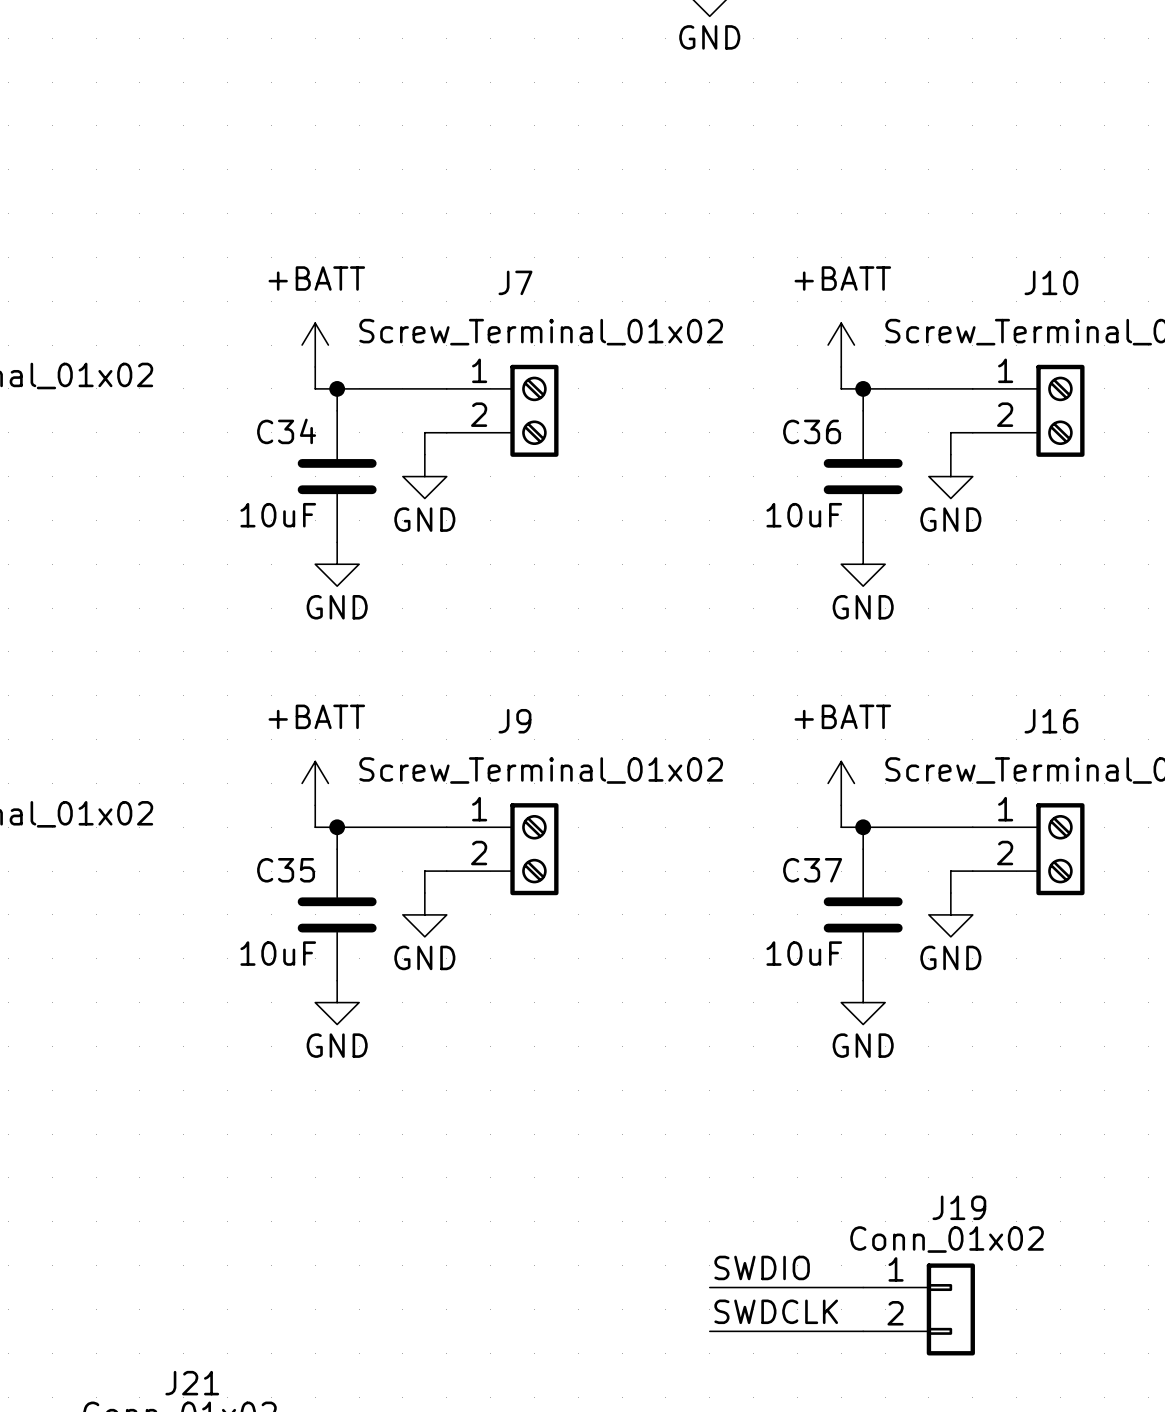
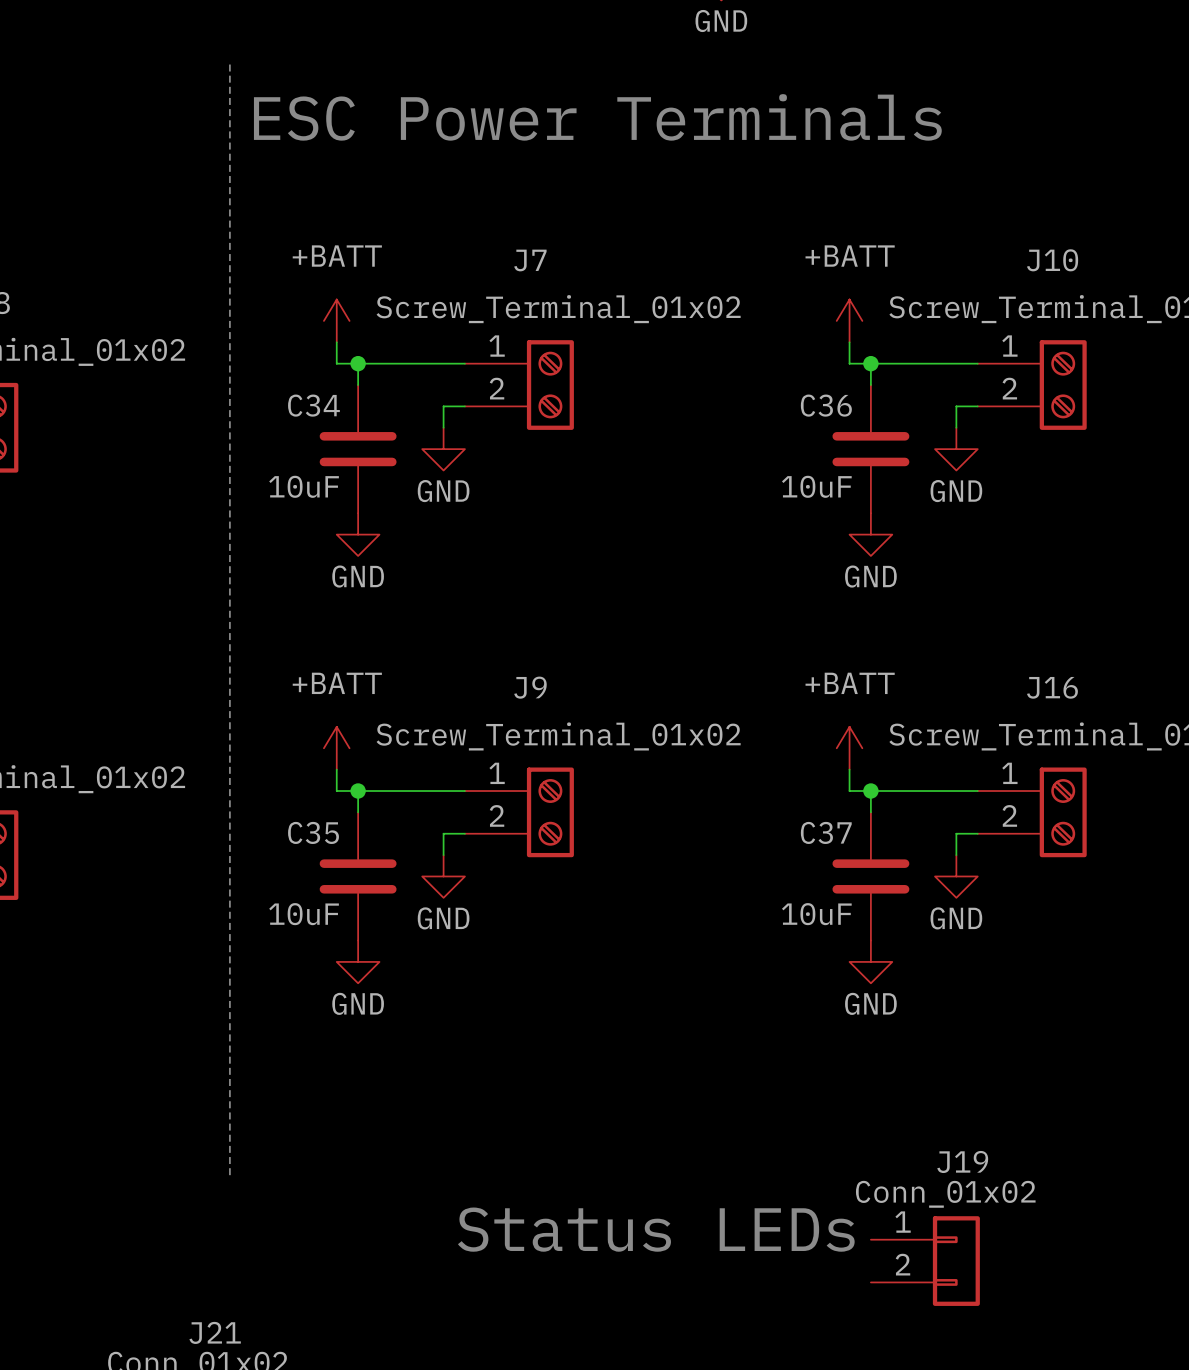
line: none -> (229, 64) (229, 1175)
text: none -> ESC Power Terminals (597, 117)
label: SWDIO (762, 1267) -> none
text: none -> Status LEDs (656, 1229)
wire: (709, 1287) (863, 1287) -> none
label: SWDCLK (776, 1311) -> none
wire: (709, 1331) (863, 1331) -> none

